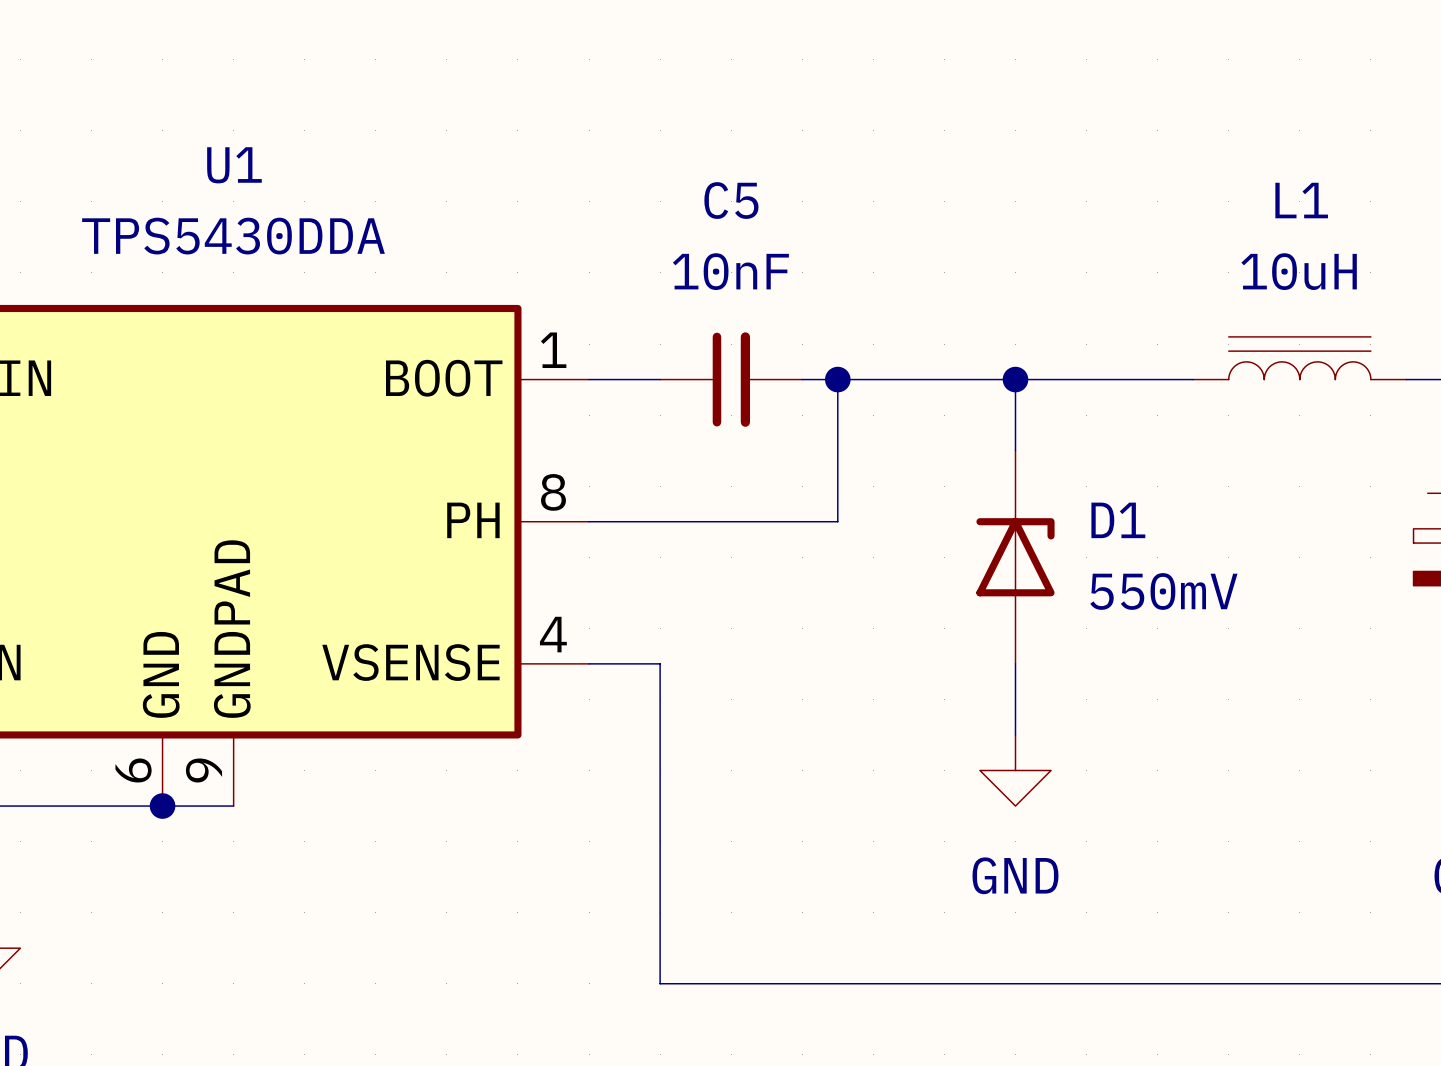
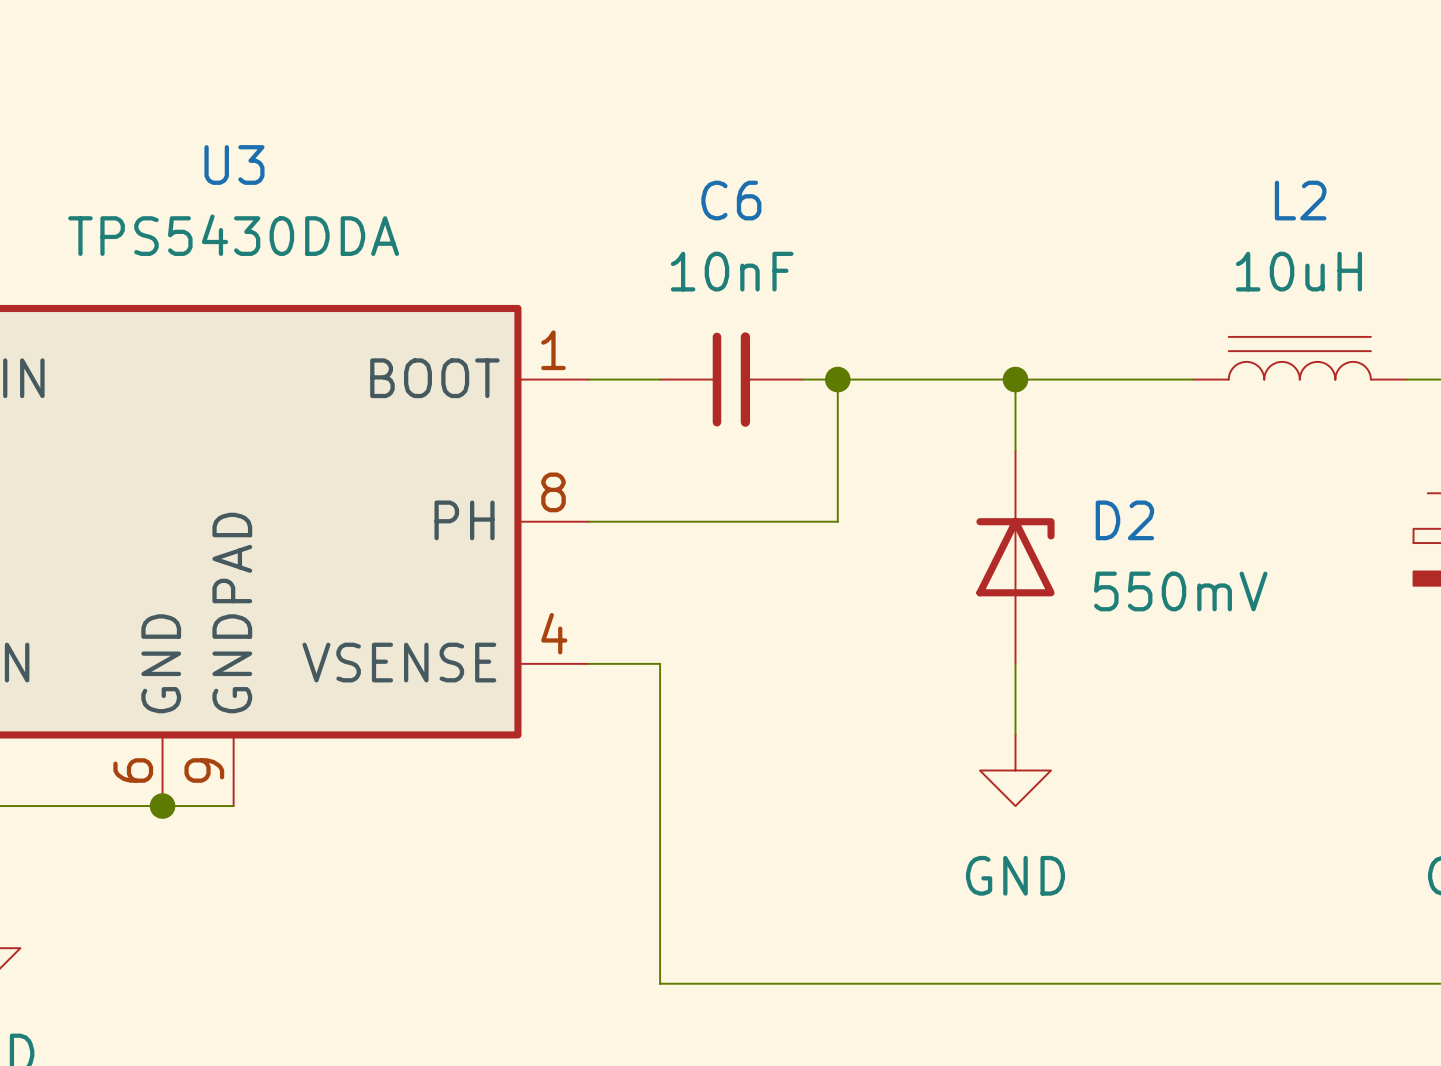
U1 name: U1 (234, 165) -> U3 (234, 165)
C5 name: C5 (731, 200) -> C6 (731, 200)
L1 name: L1 (1301, 200) -> L2 (1300, 200)
D1 name: D1 (1118, 520) -> D2 (1124, 520)

